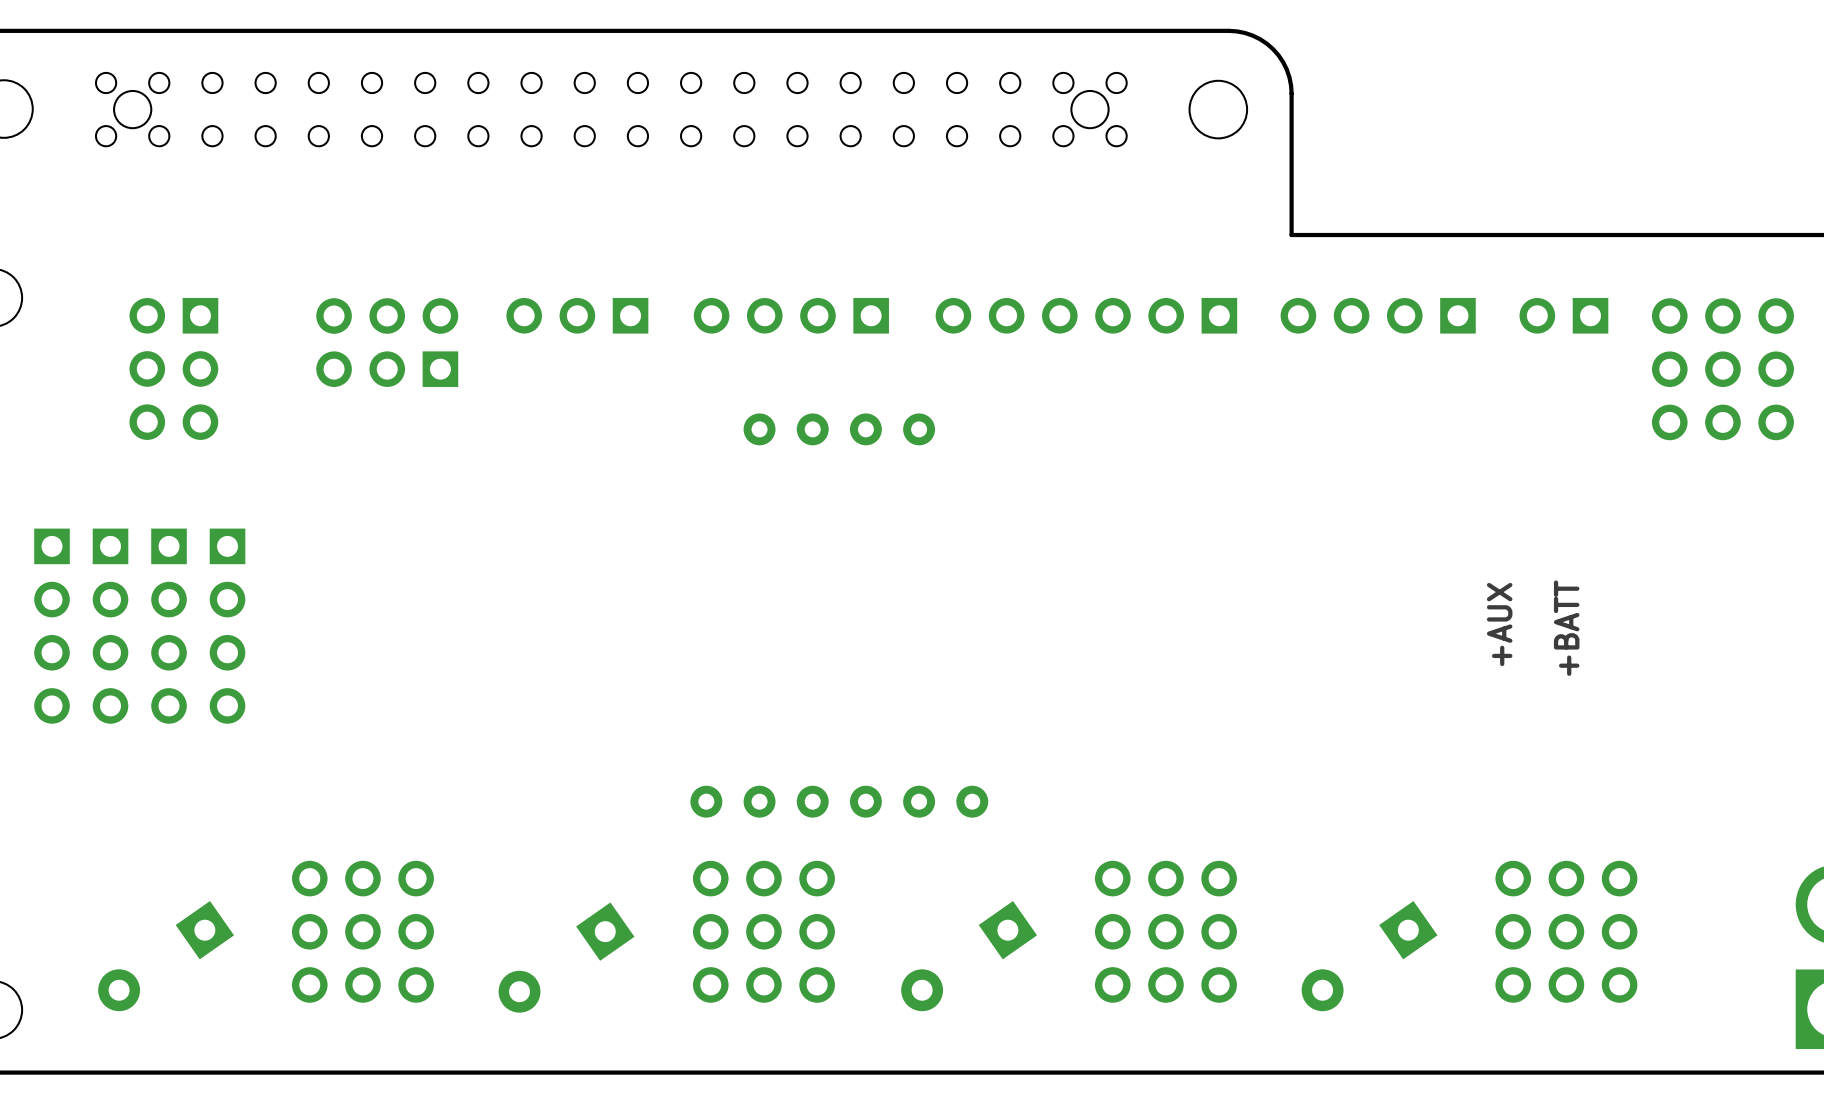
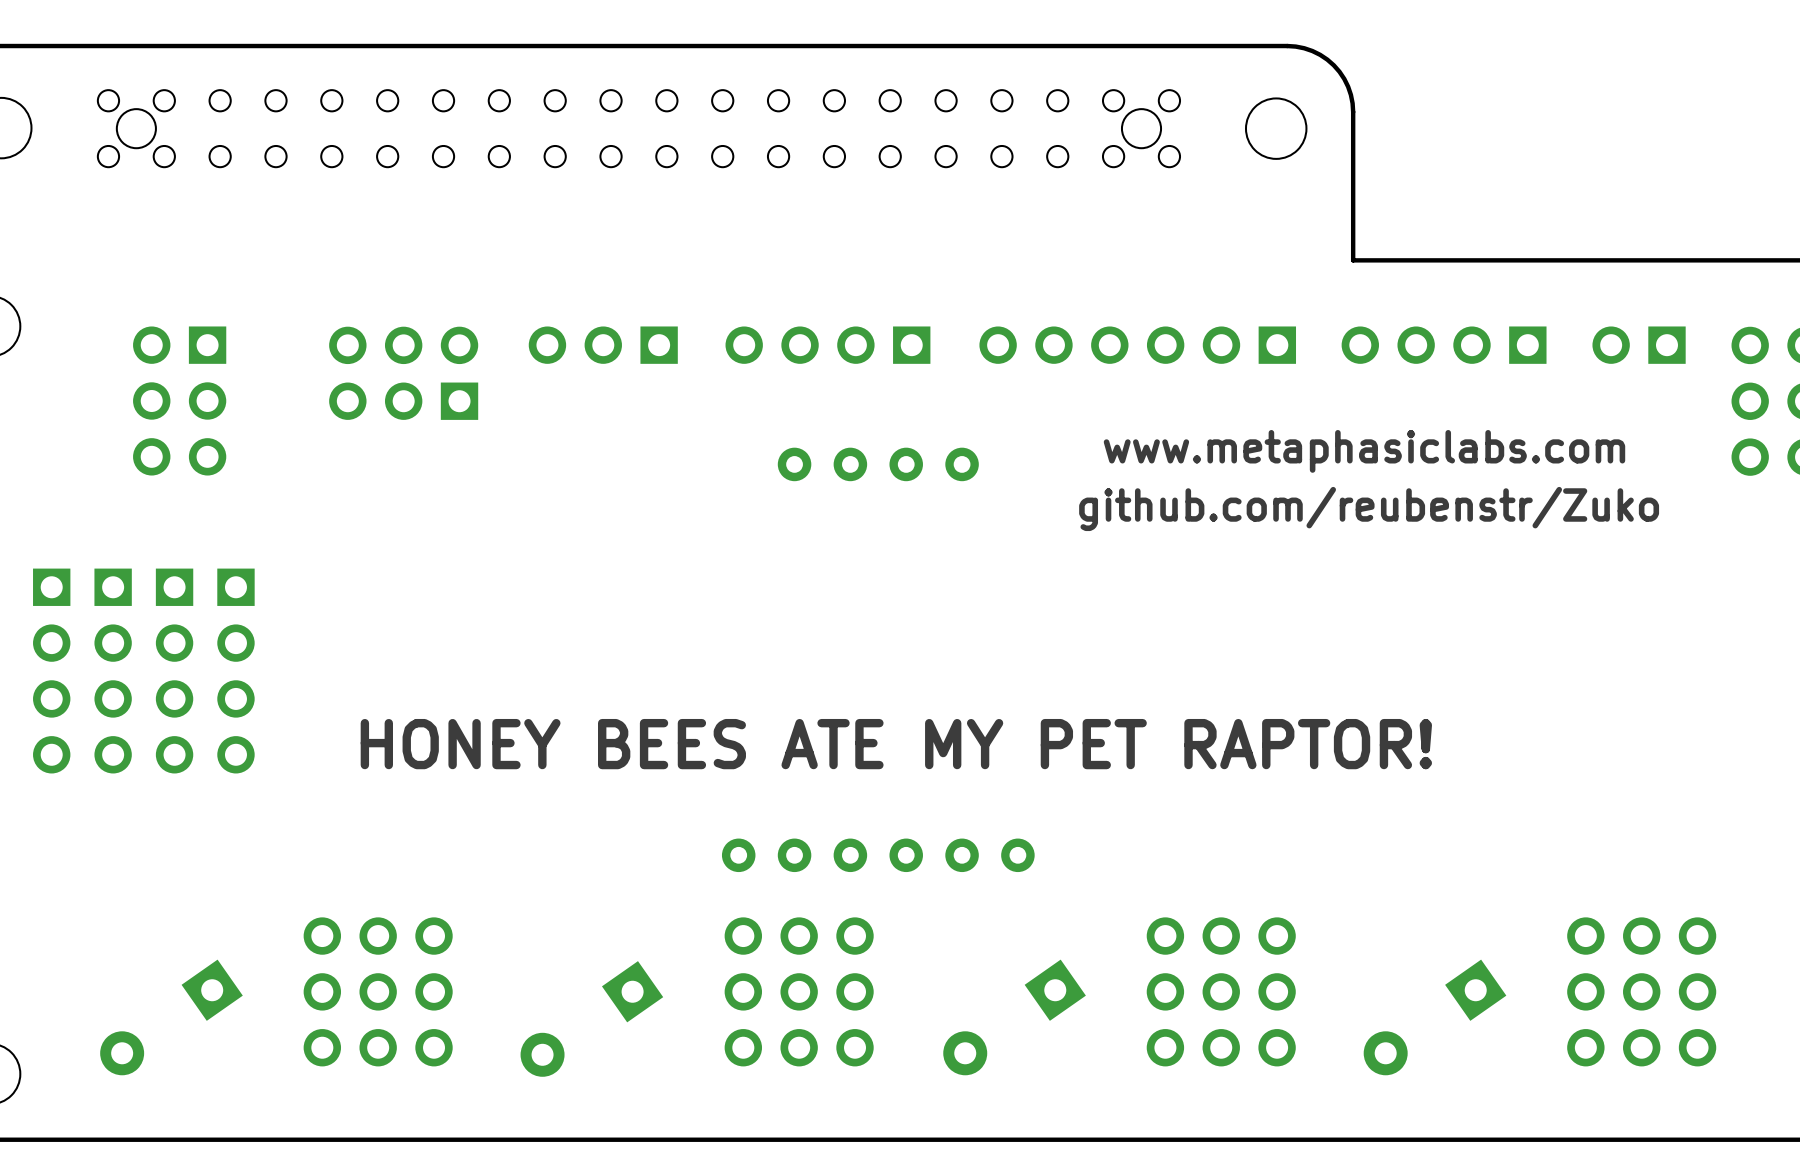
text: none -> www.metaphasiclabs.com (1364, 451)
text: none -> github.com/reubenstr/Zuko (1369, 508)
text: +AUX (1499, 624) -> none
text: +BATT (1566, 628) -> none
text: none -> HONEY BEES ATE MY PET RAPTOR! (896, 744)

